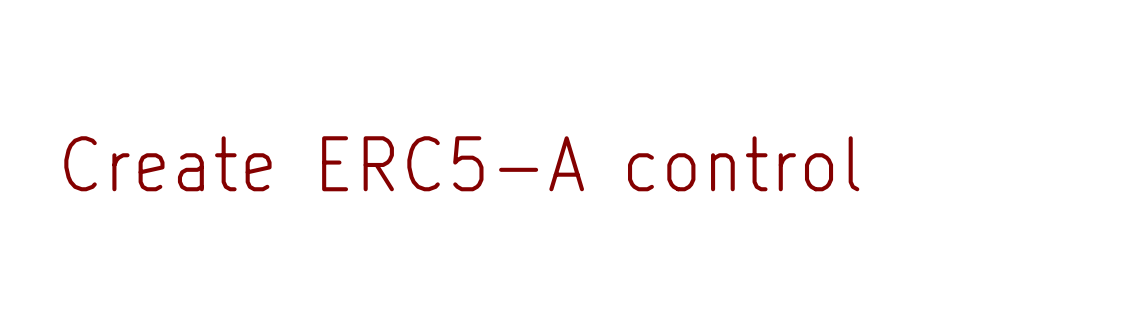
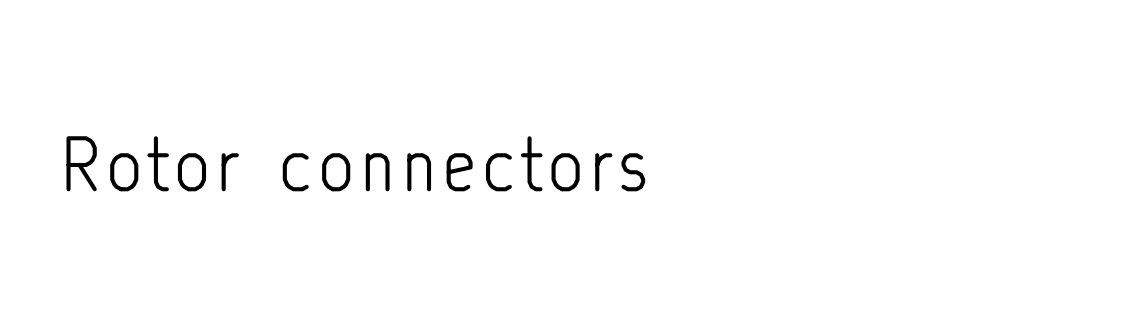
text: Create ERC5-A control (461, 163) -> Rotor connectors (355, 163)

